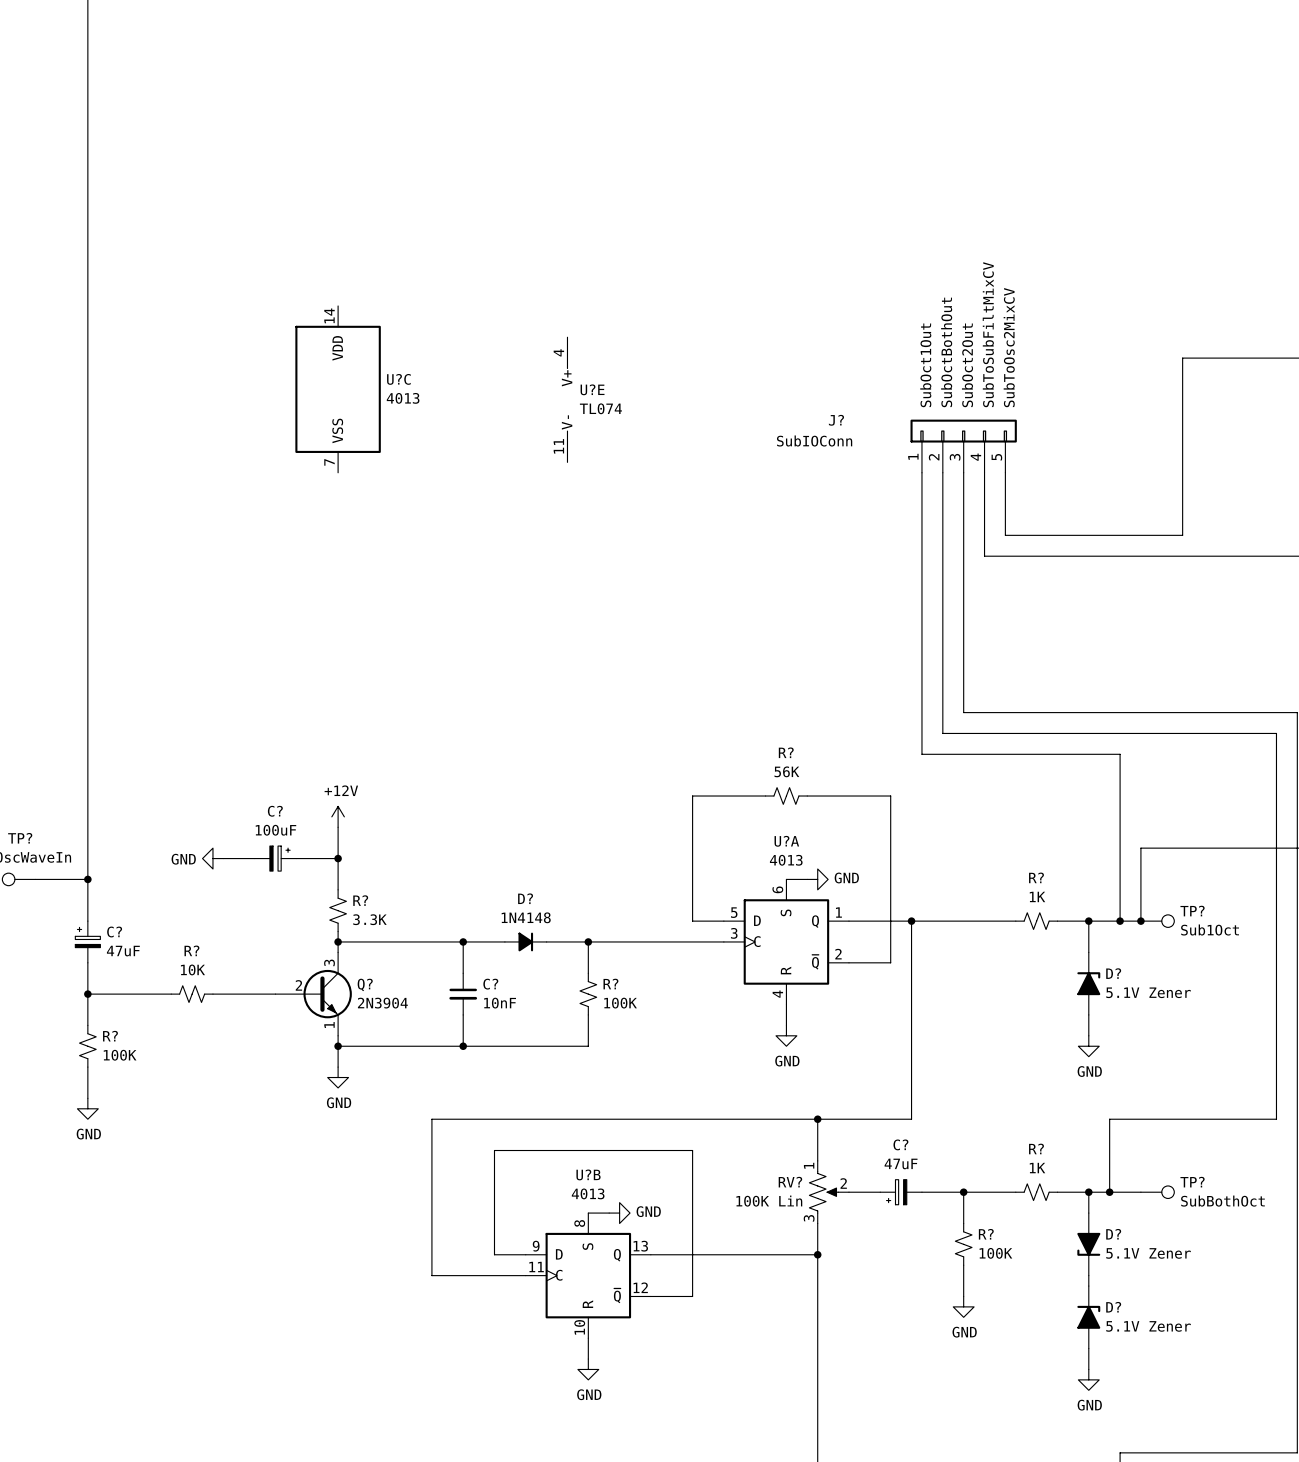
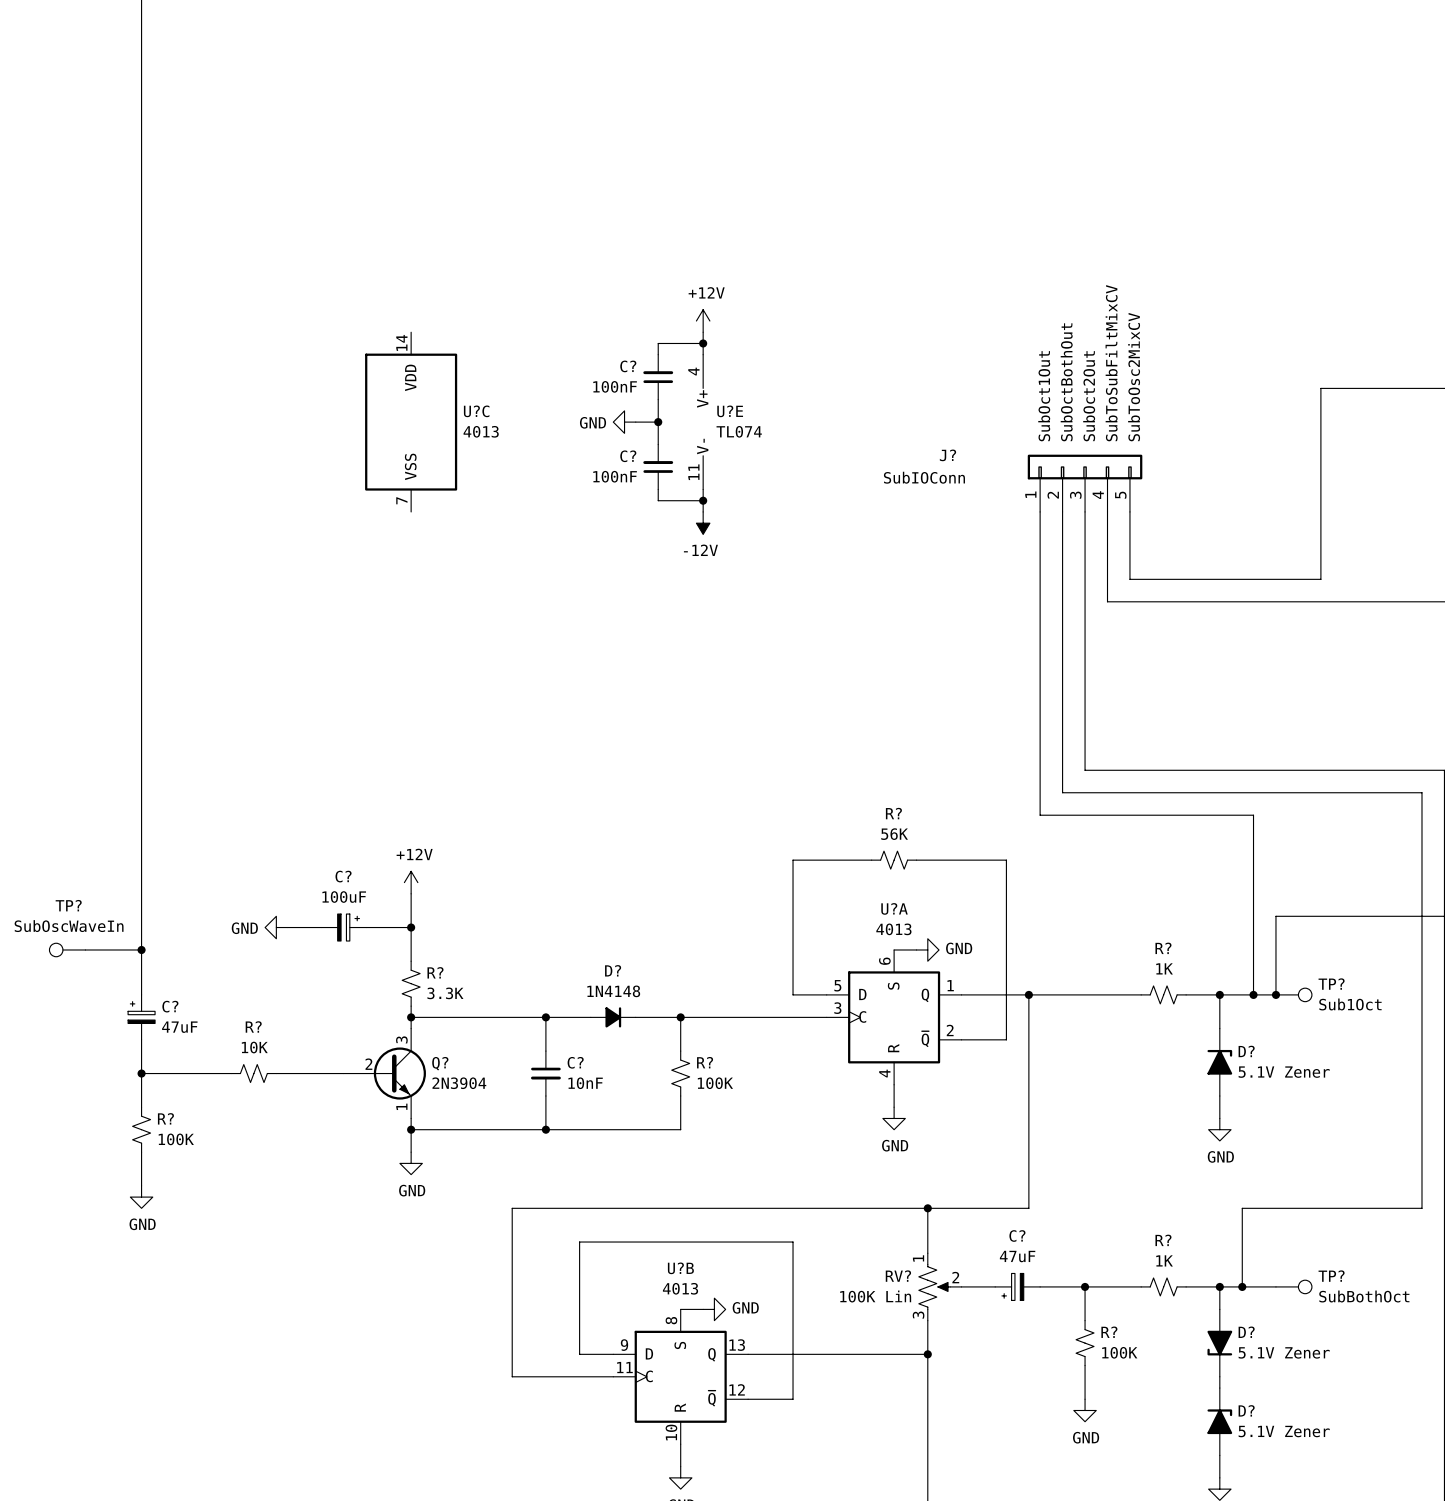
power symbol: none -> +12V (703, 321)
wire: none -> (703, 332) (703, 354)
wire: none -> (703, 343) (658, 343) (658, 354)
junction: none -> (703, 343)
C?: none -> 100nF (658, 377)
wire: none -> (658, 399) (658, 444)
power symbol: none -> GND (624, 422)
wire: none -> (635, 422) (658, 422)
junction: none -> (658, 422)
U?E position: (567, 399) -> (703, 422)
C?: none -> 100nF (658, 467)
wire: none -> (658, 489) (658, 500) (703, 500)
wire: none -> (703, 489) (703, 511)
junction: none -> (703, 500)
power symbol: none -> -12V (703, 523)

